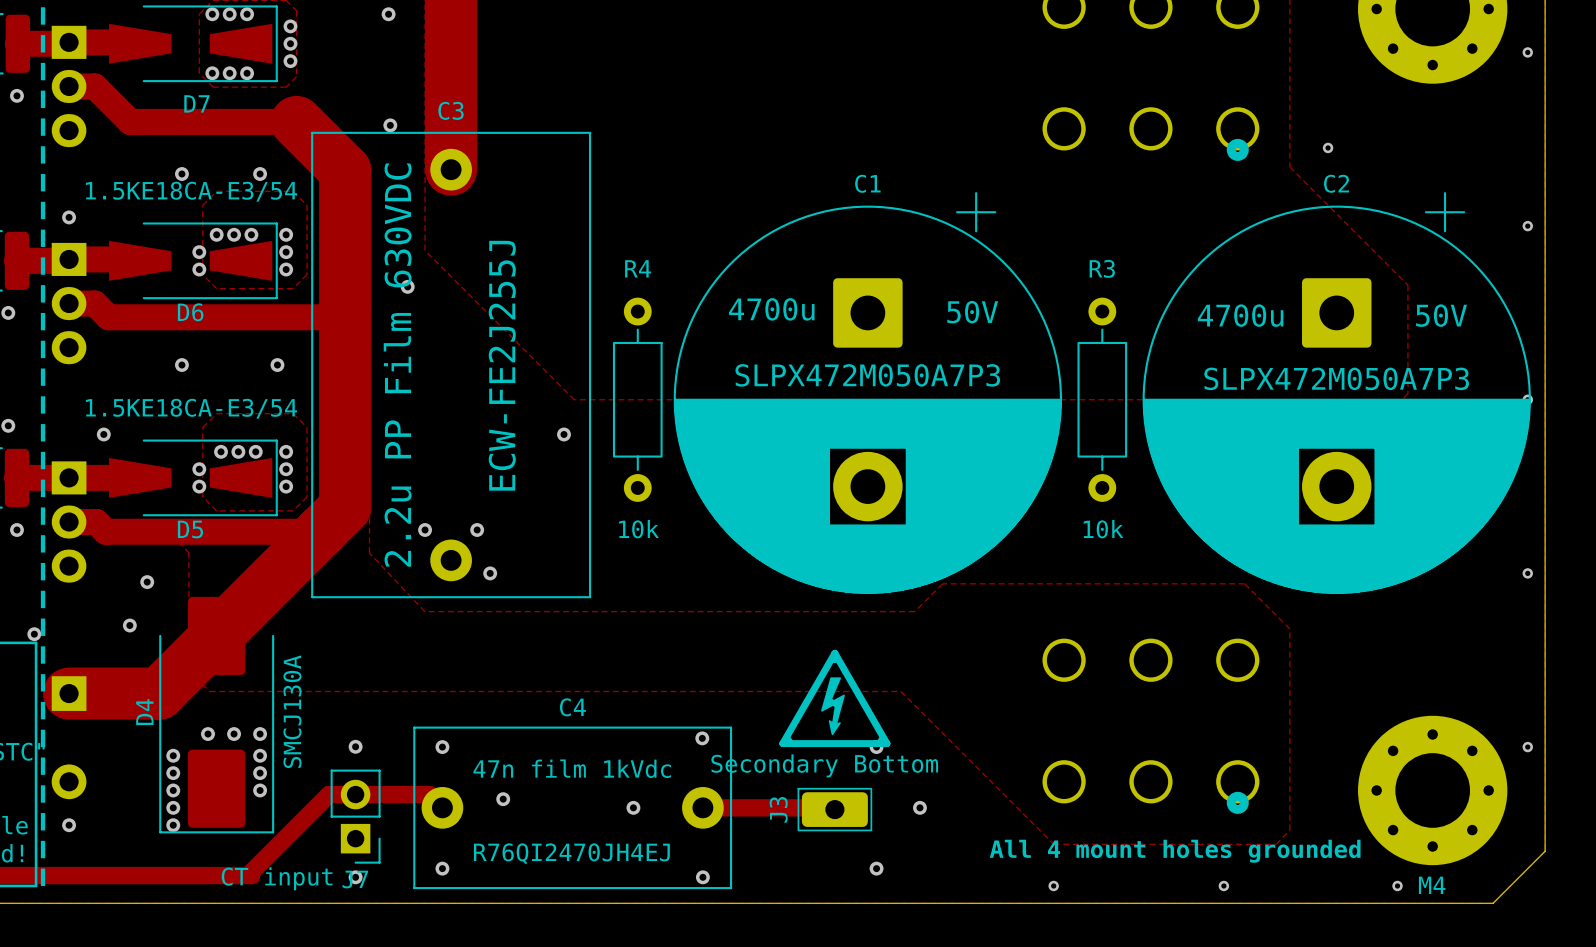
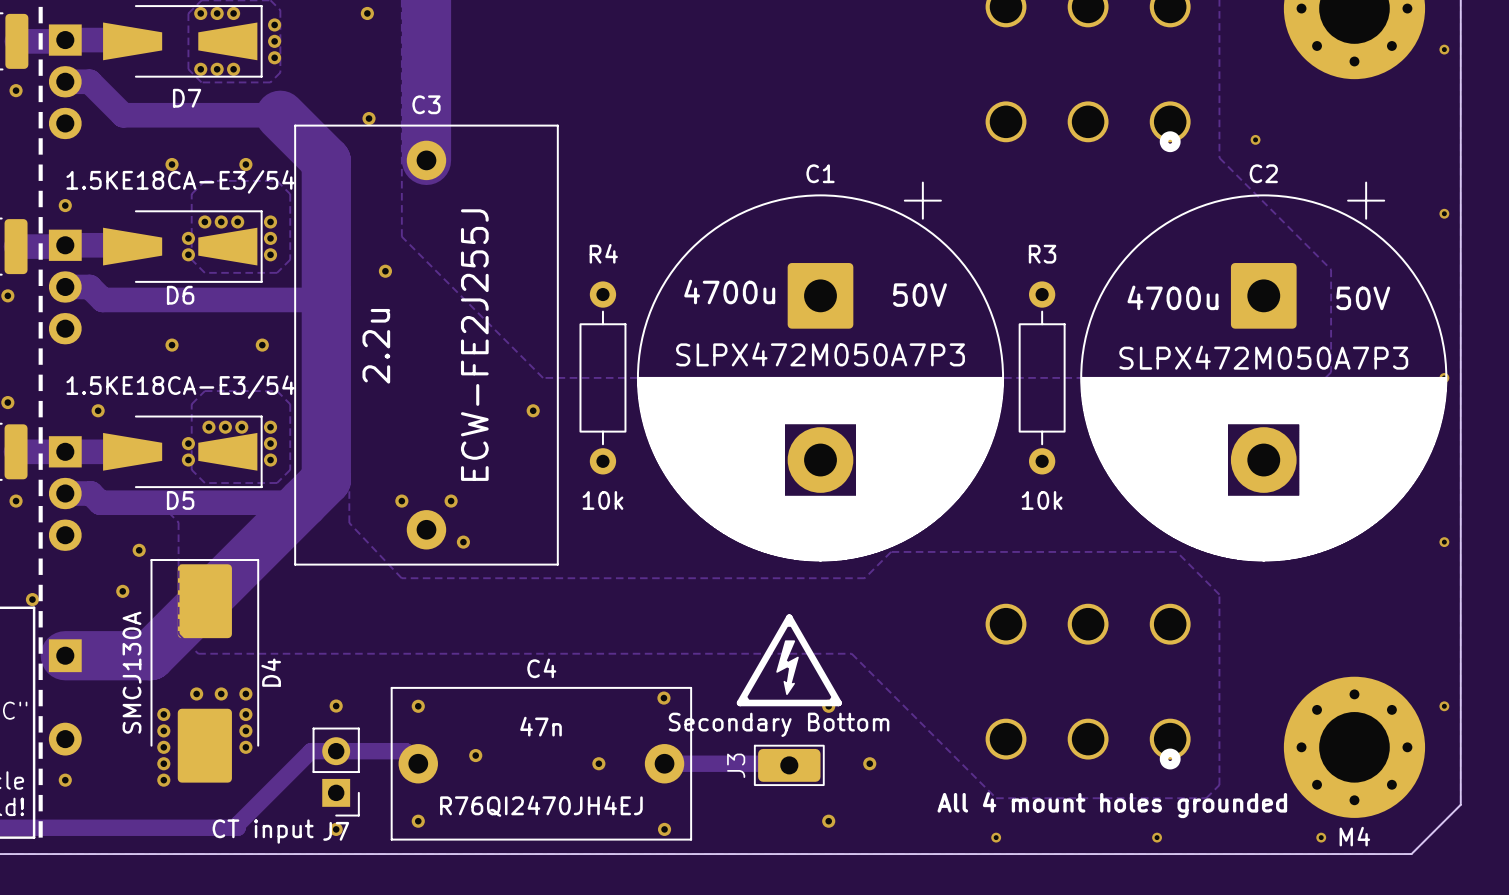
C3 value: 2.2u PP Film 630VDC (397, 365) -> 2.2u (376, 346)
D4 rotation: 0° (216, 715) -> 180° (204, 670)
C4 value: 47n film 1kVdc (572, 768) -> 47n (541, 726)

